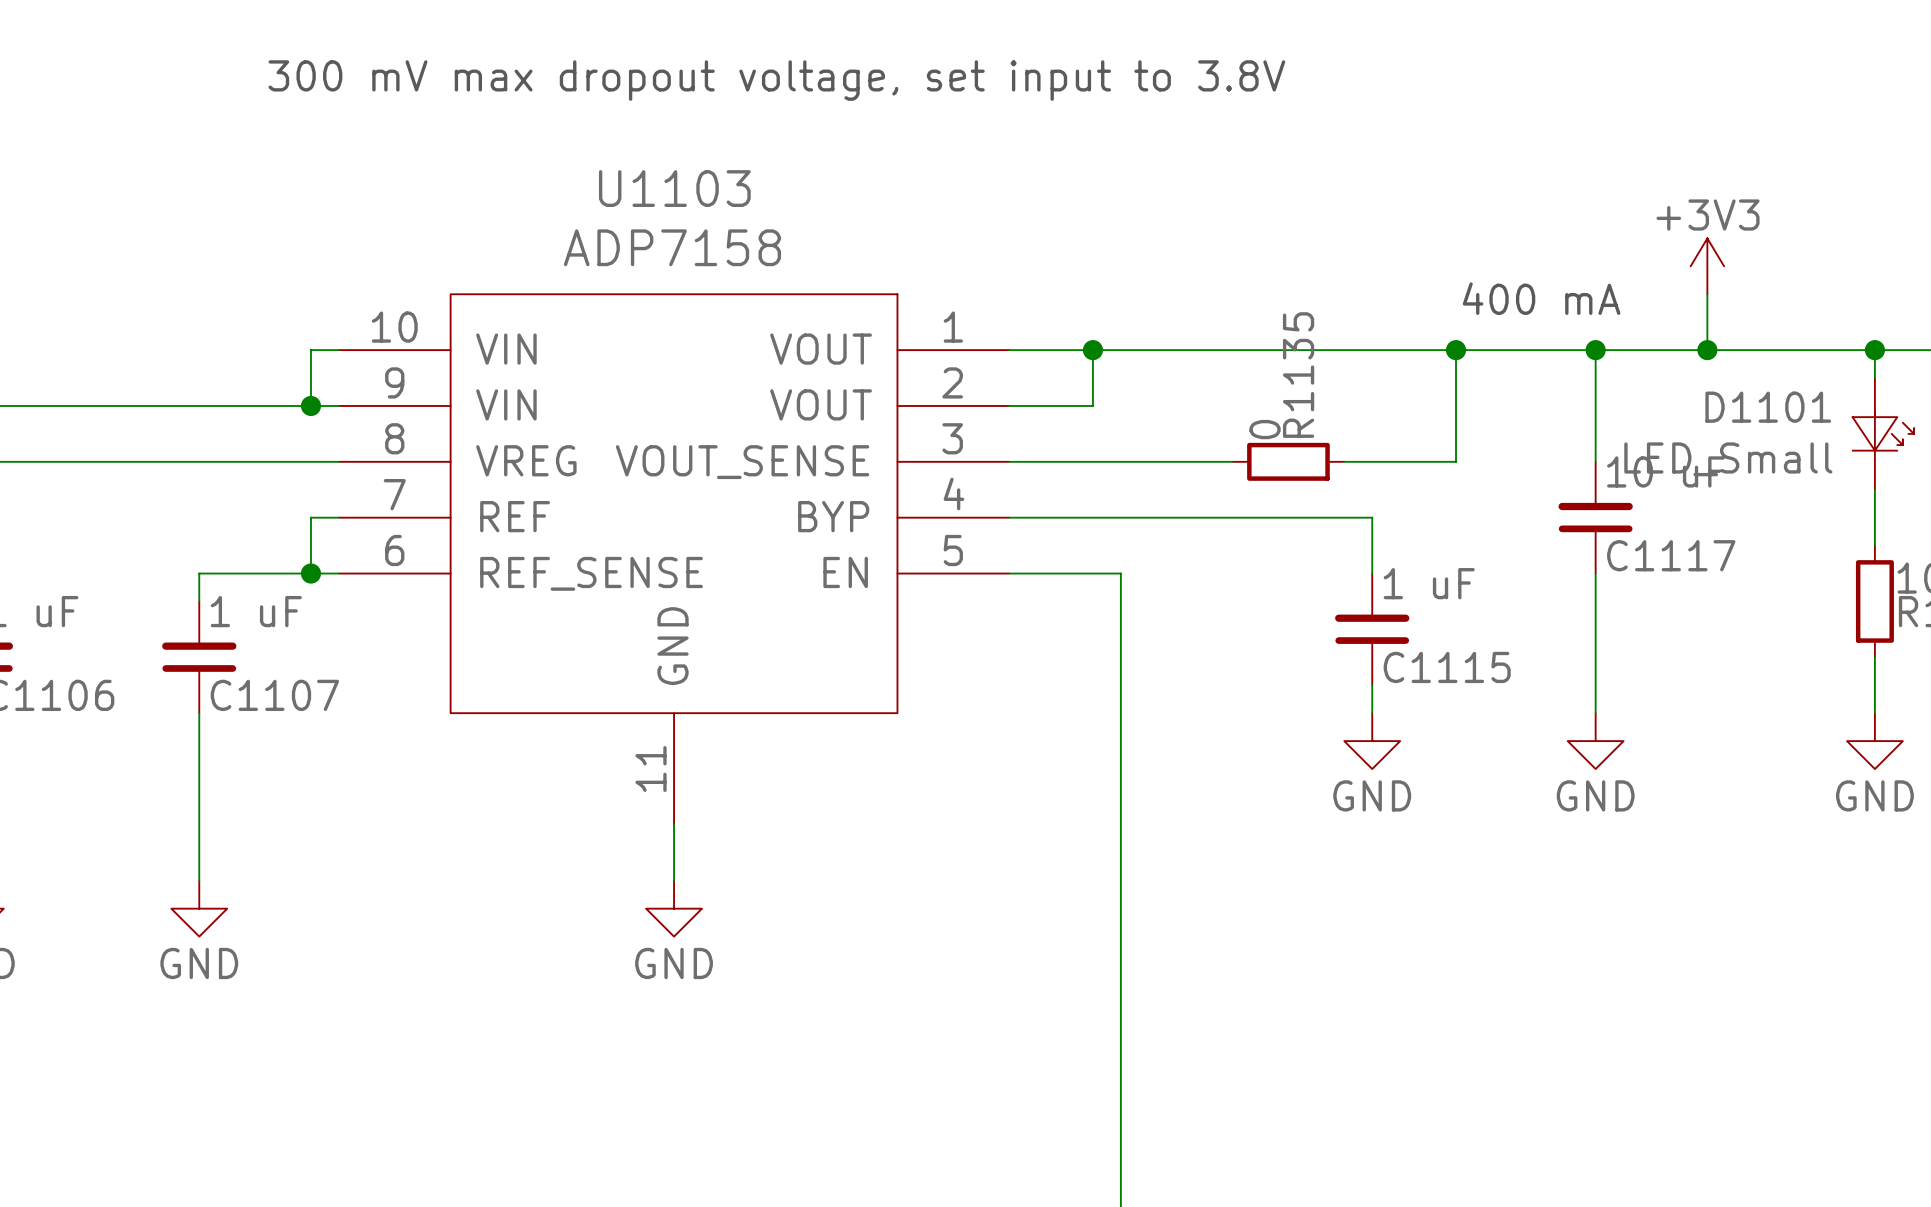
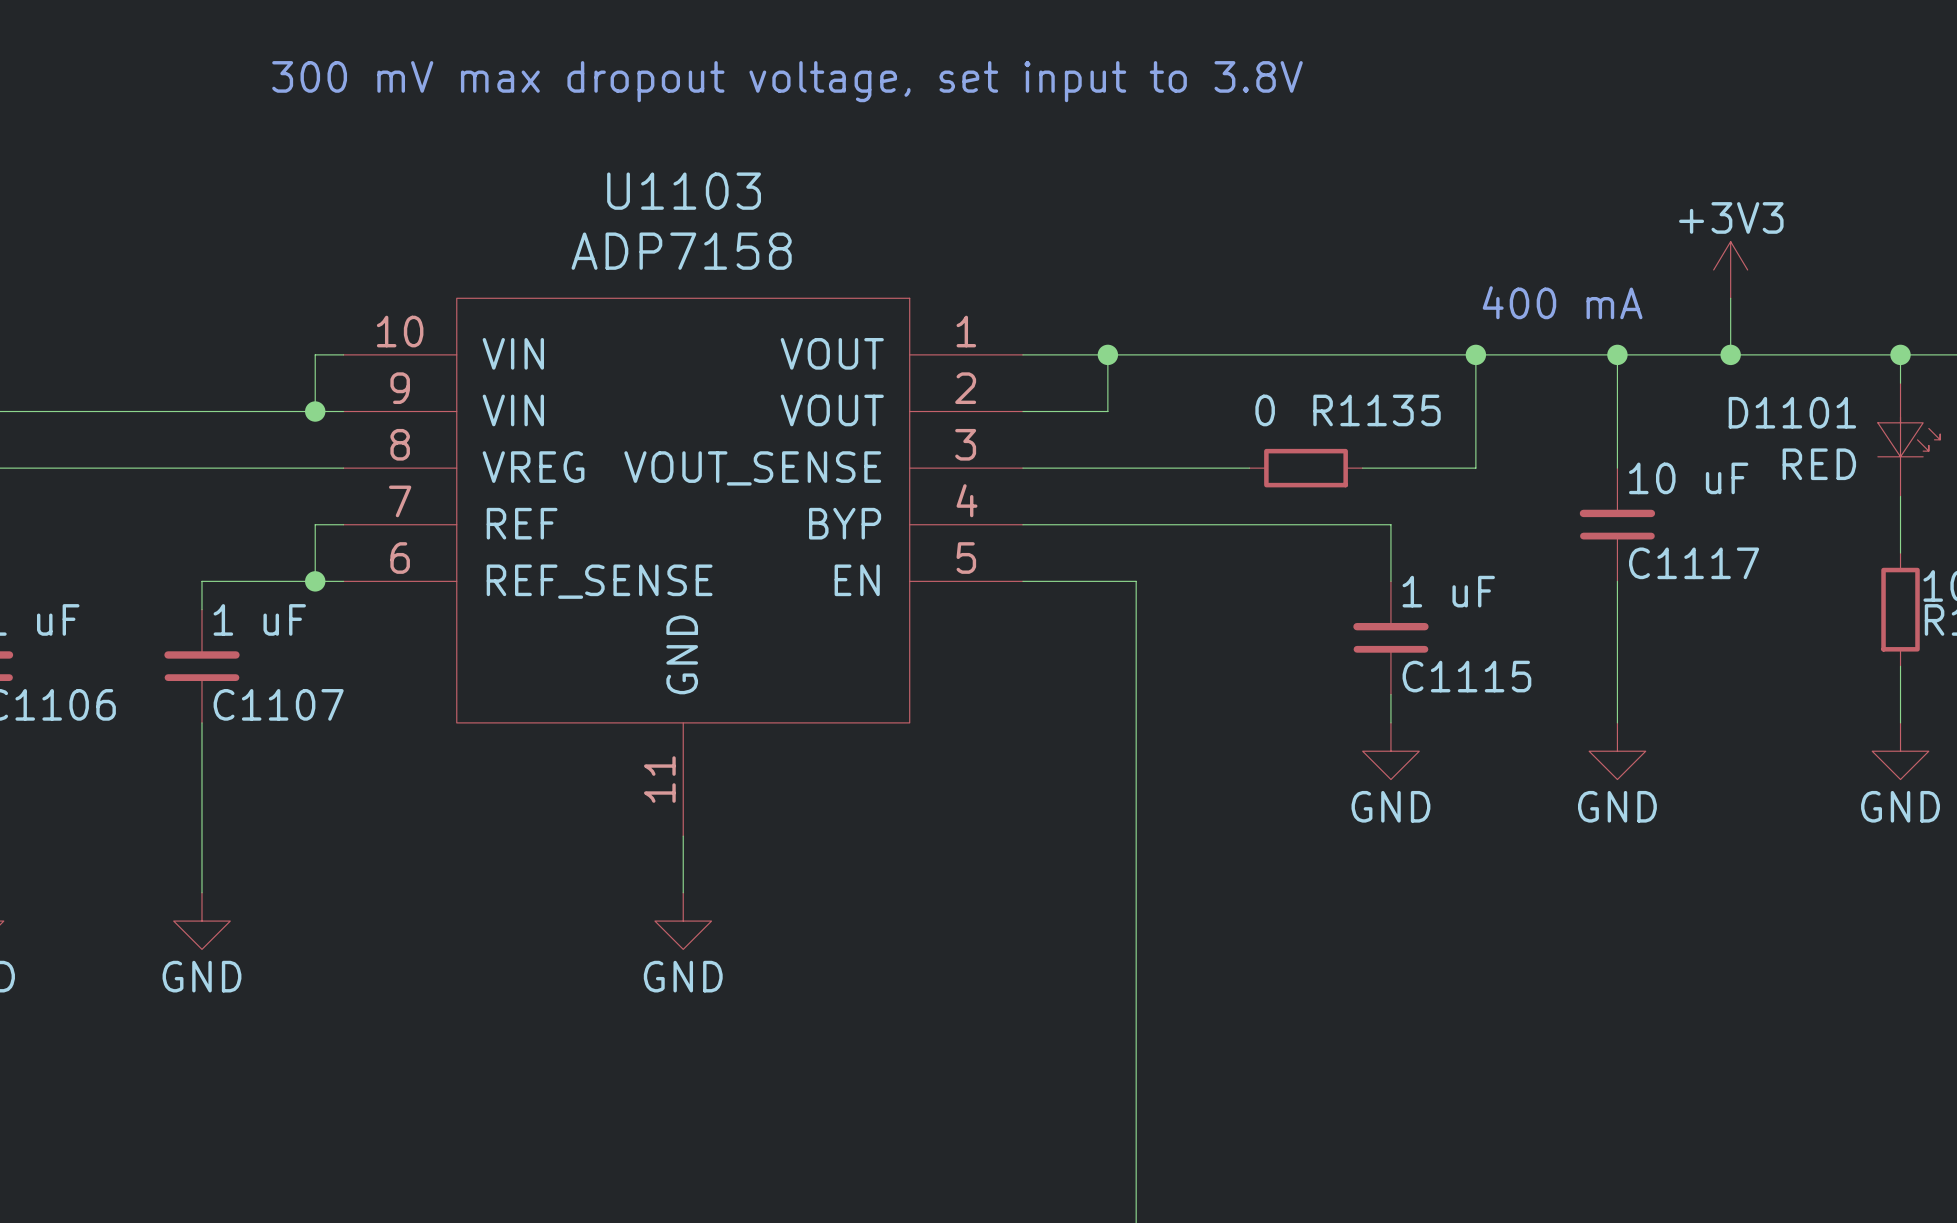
R1135 name rotation: 0° (1298, 375) -> 90° clockwise (1377, 410)
R1135 value rotation: 0° (1265, 429) -> 90° clockwise (1265, 410)
D1101 value: LED_Small (1728, 459) -> RED (1819, 464)

